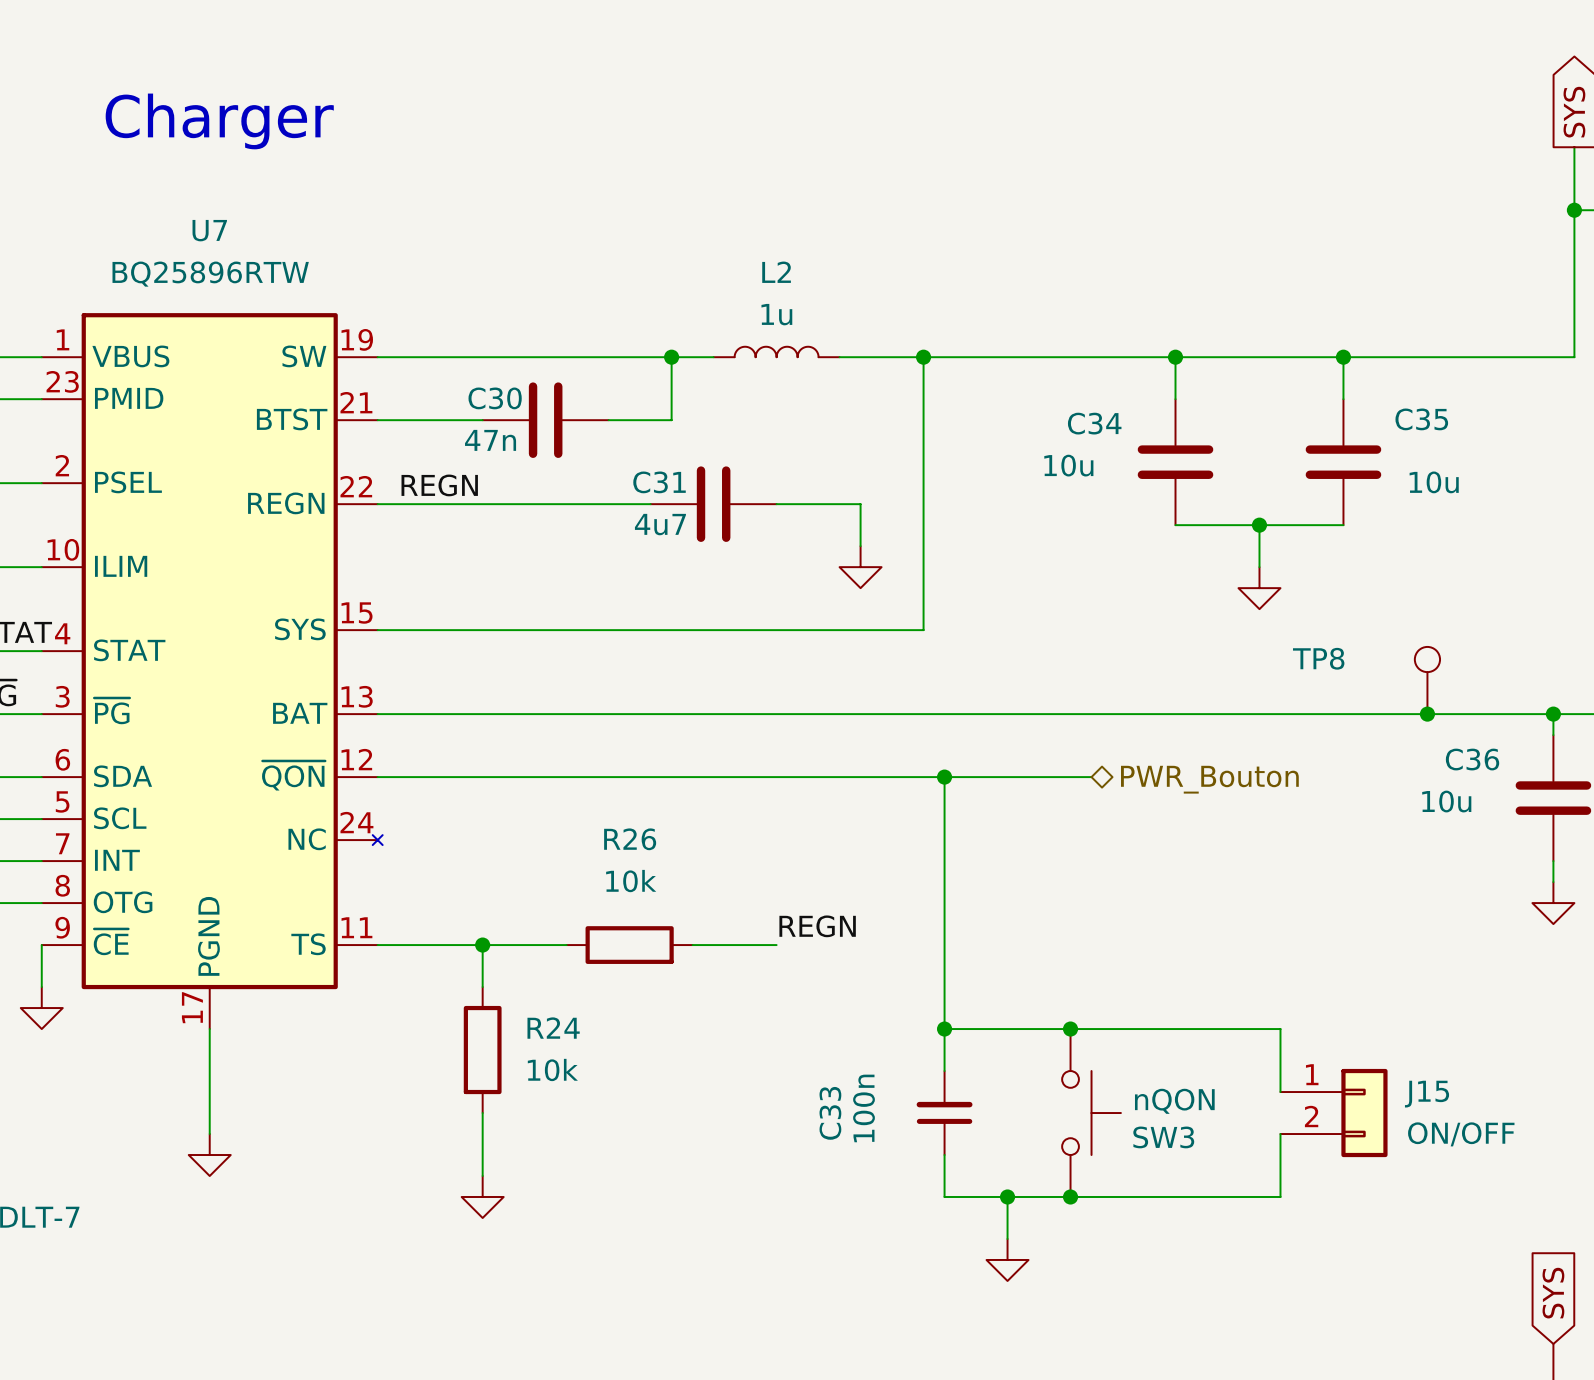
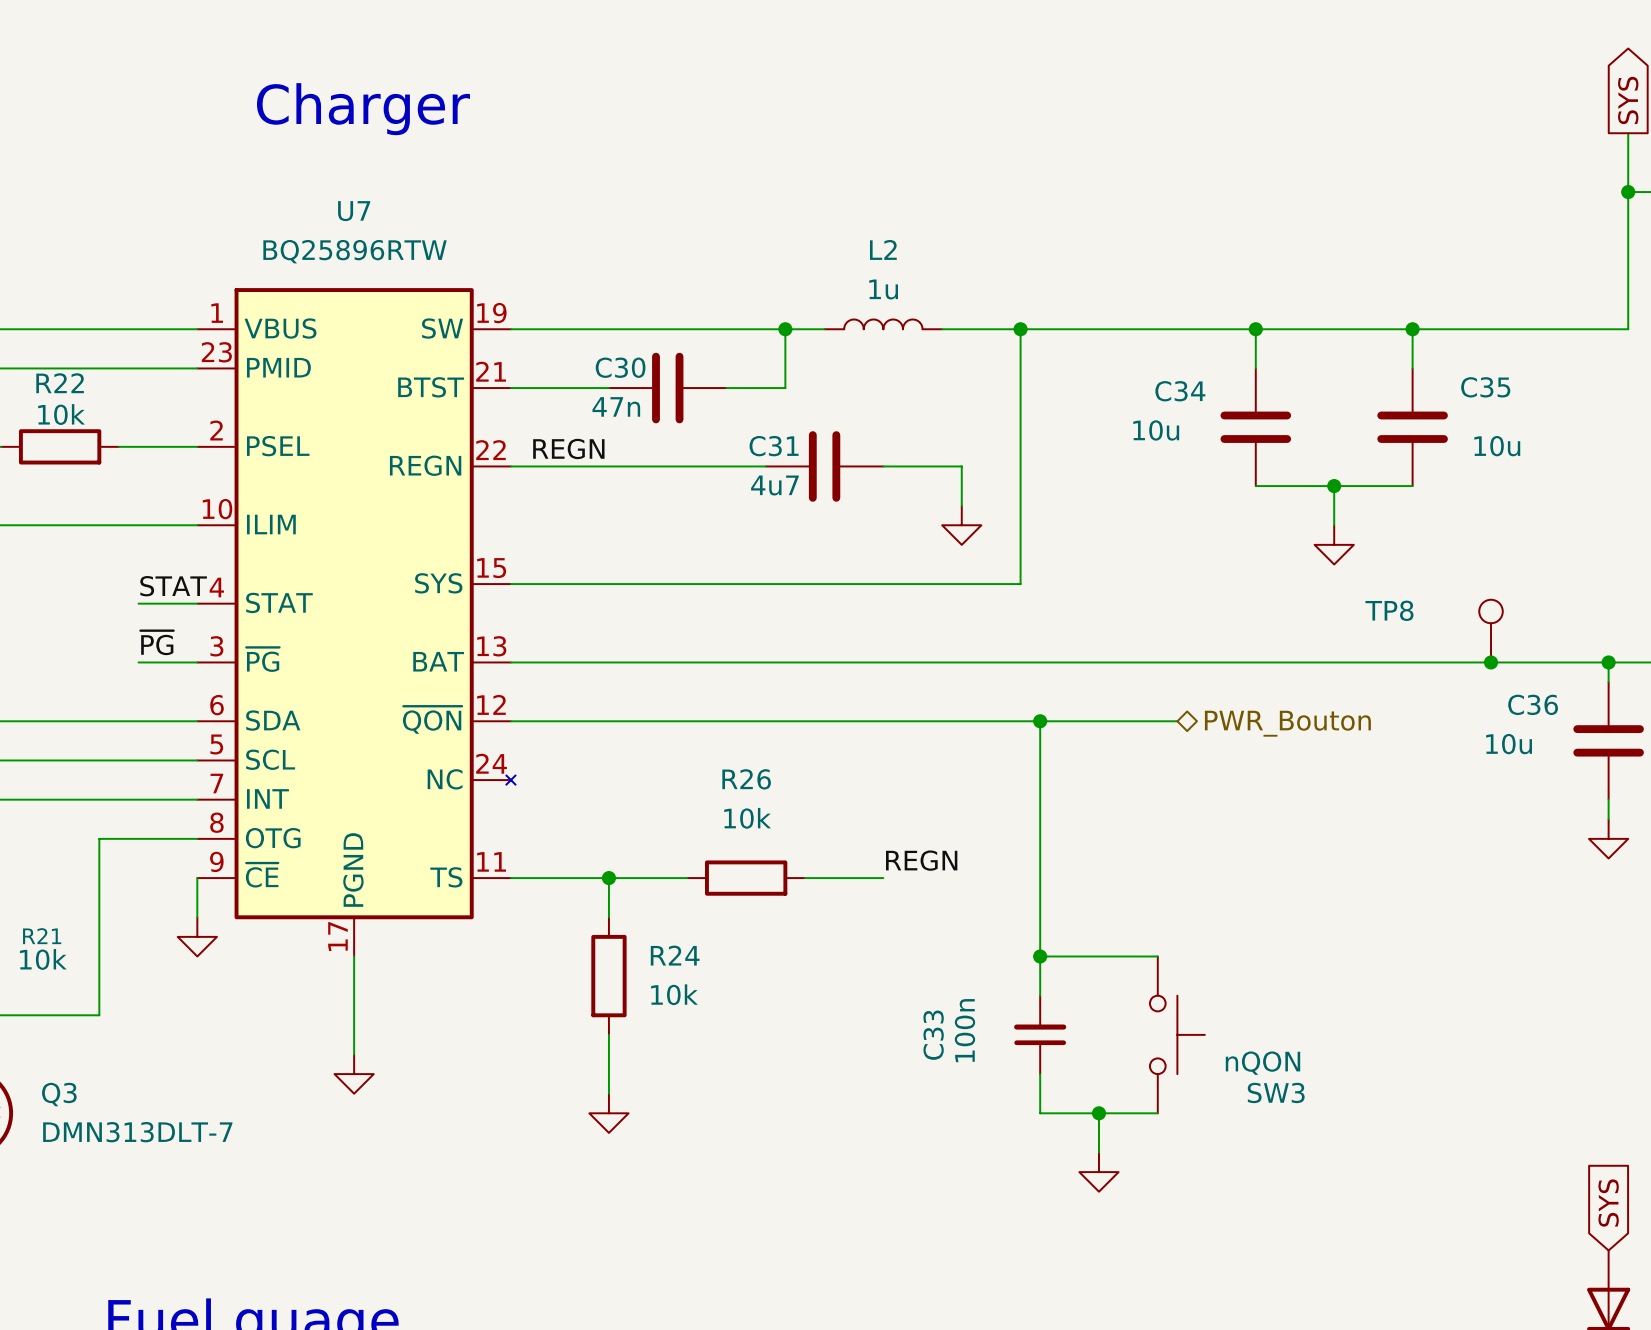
wire: (1070, 1029) (1280, 1029) (1280, 1092) -> none
junction: (1070, 1029) -> none
SW3 value position: nQON (1174, 1101) -> nQON (1263, 1063)
J15: ON/OFF (1334, 1113) -> none
wire: (1280, 1134) (1280, 1196) (1070, 1196) -> none
SW3 name position: SW3 (1163, 1137) -> SW3 (1276, 1092)
junction: (1070, 1196) -> none

